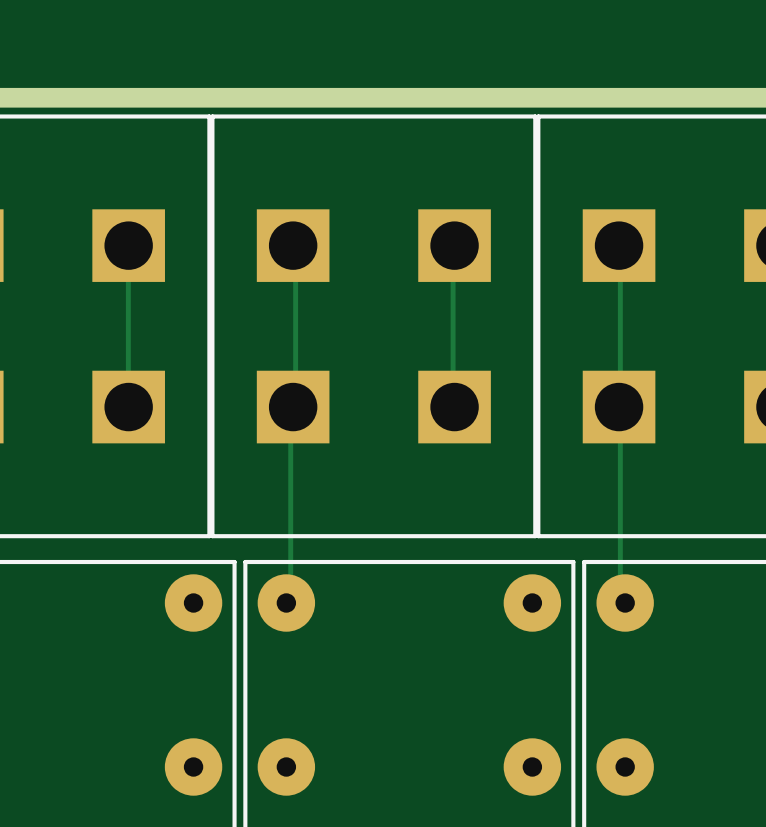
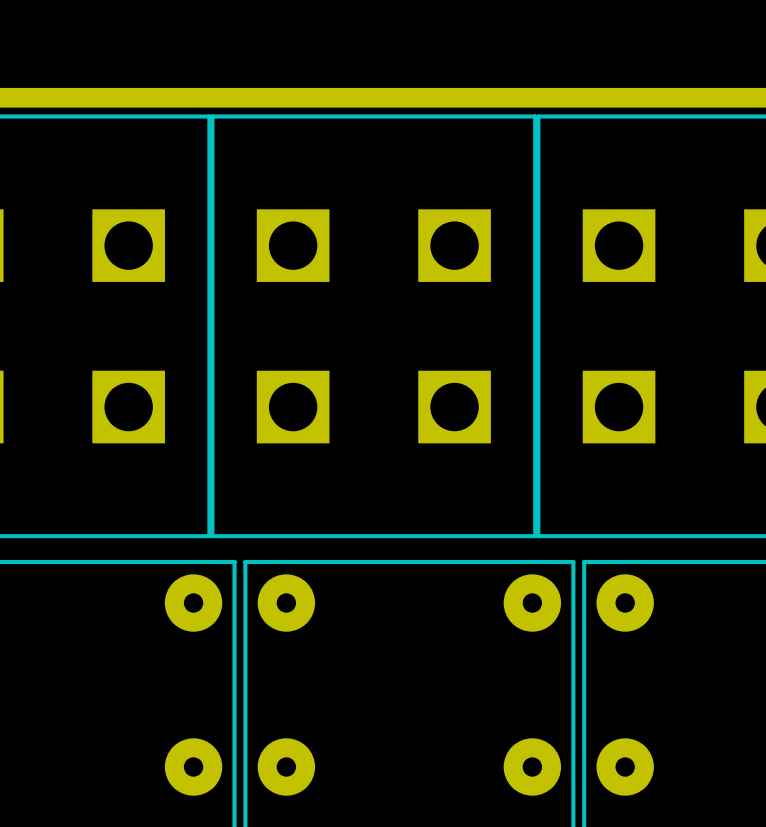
track: (128, 245) (128, 407) -> none
track: (293, 245) (295, 247) (295, 405) (290, 409) (290, 601) (286, 603) -> none
track: (454, 245) (454, 407) -> none
track: (619, 245) (620, 601) (625, 603) -> none

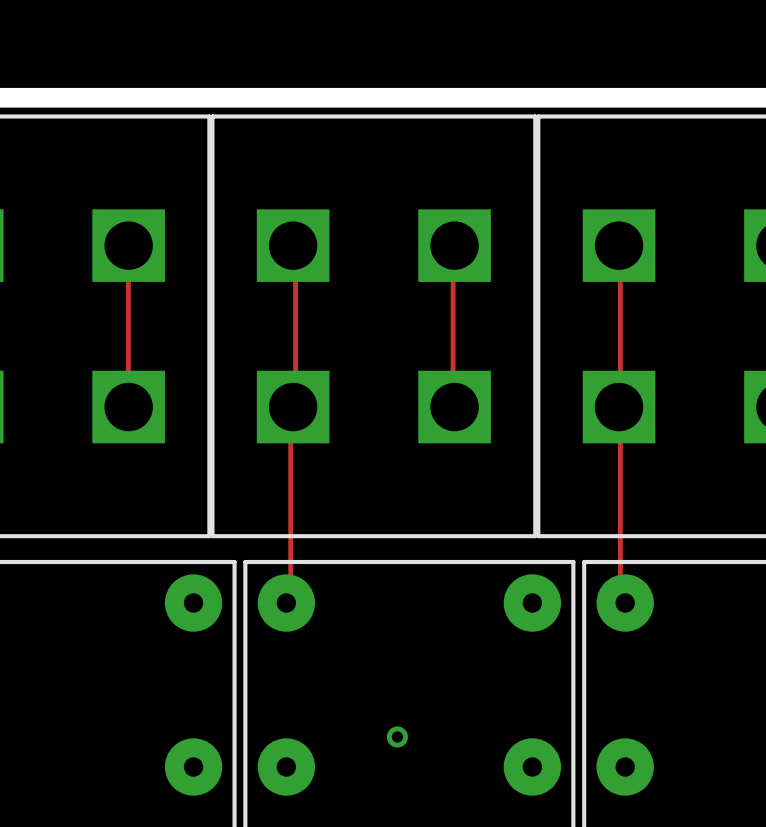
track: none -> (128, 245) (128, 407)
track: none -> (293, 245) (295, 247) (295, 405) (290, 409) (290, 601) (286, 603)
track: none -> (454, 245) (454, 407)
track: none -> (619, 245) (620, 601) (625, 603)
via: none -> (397, 736)

